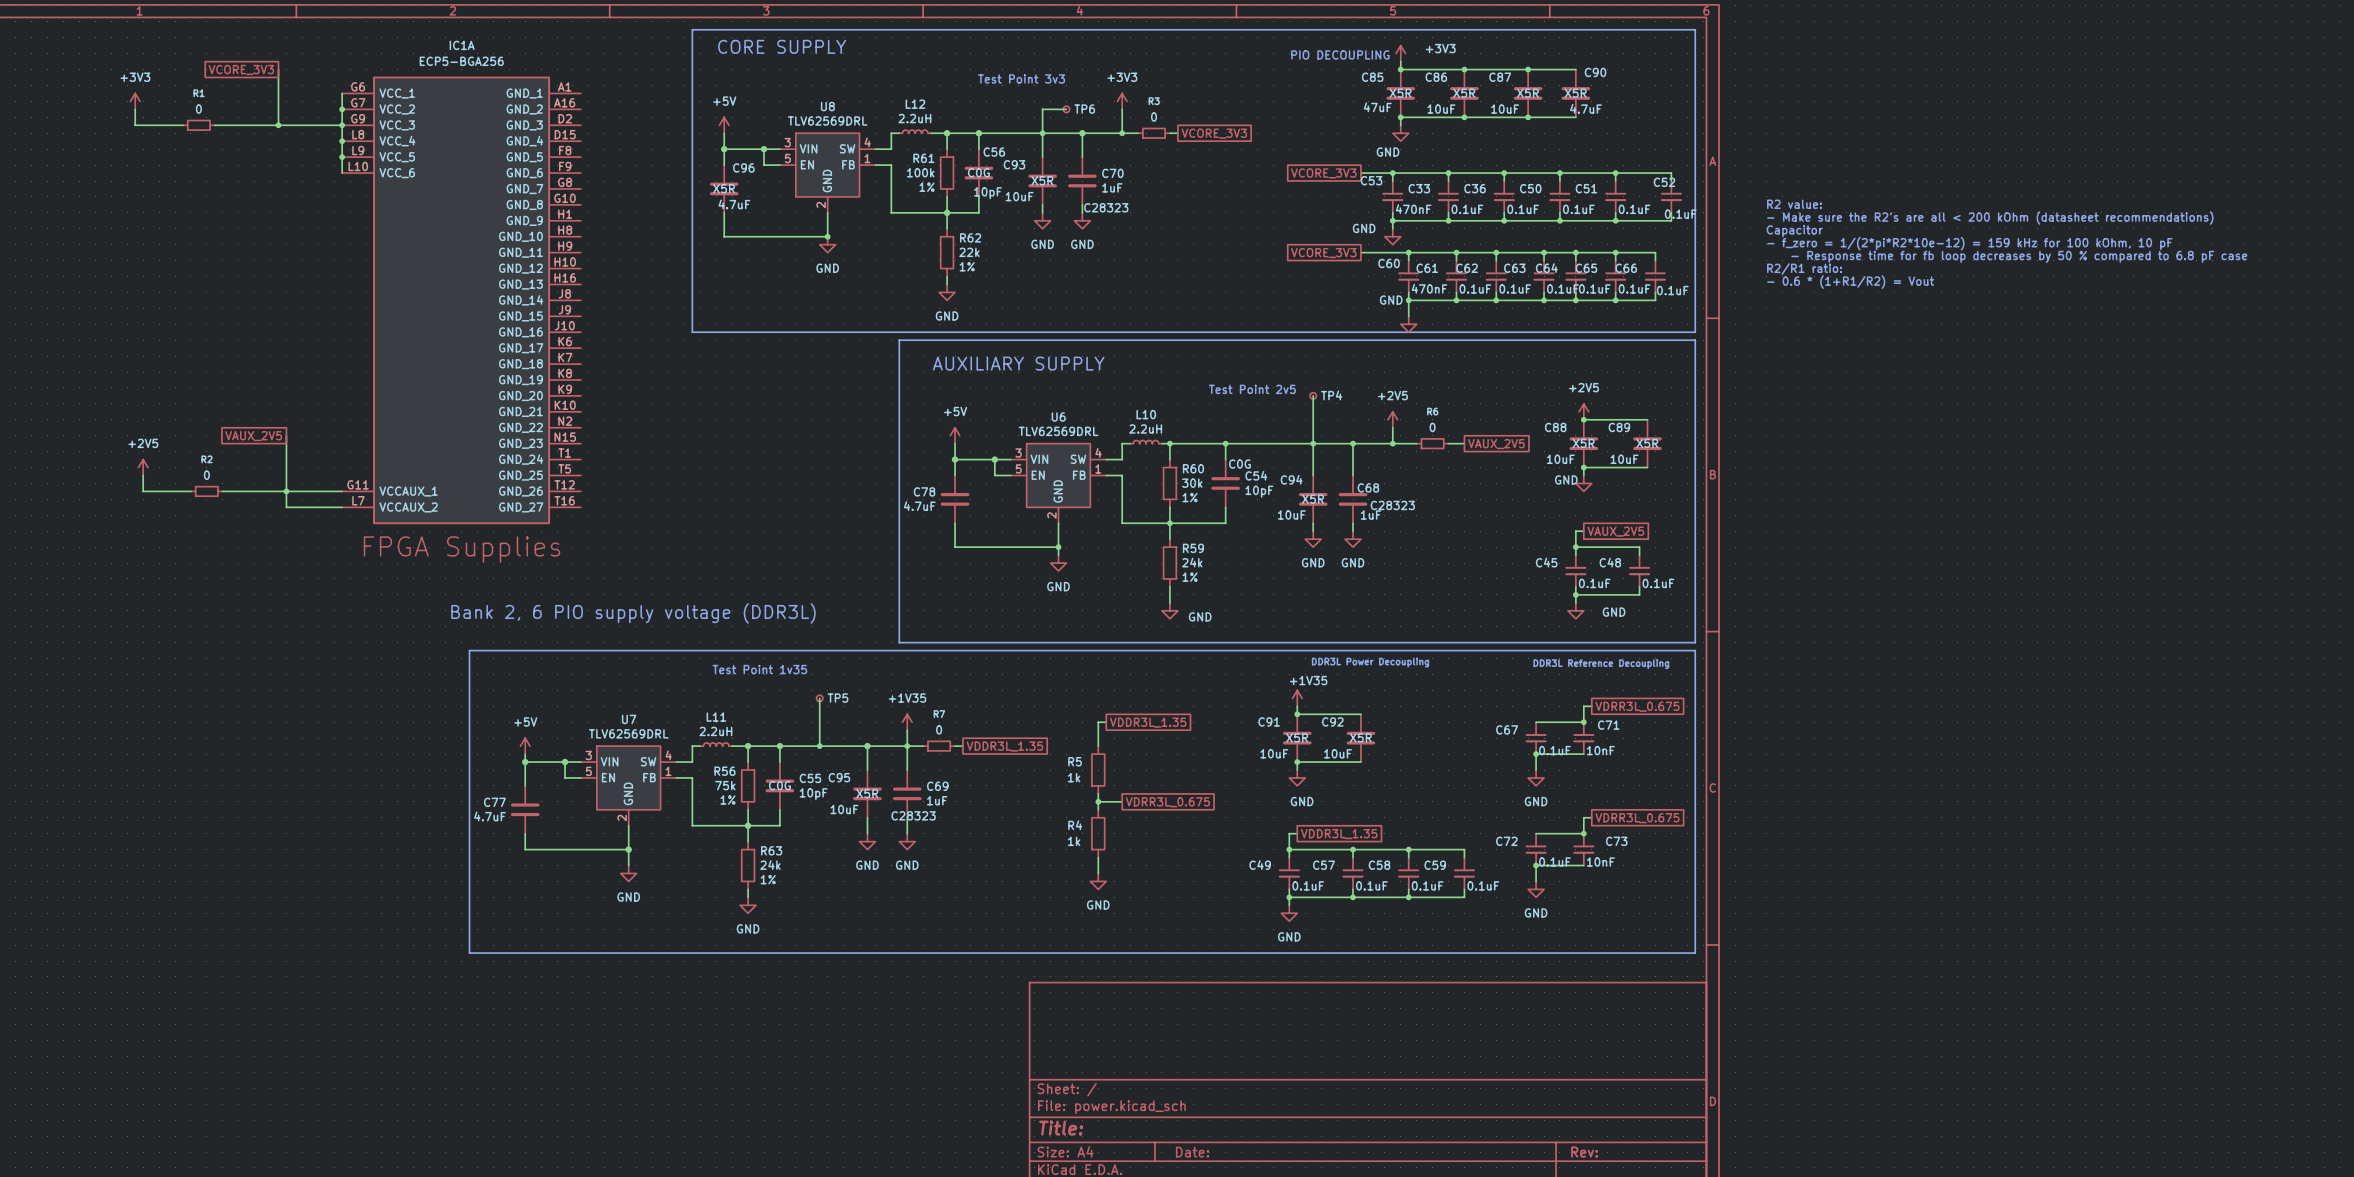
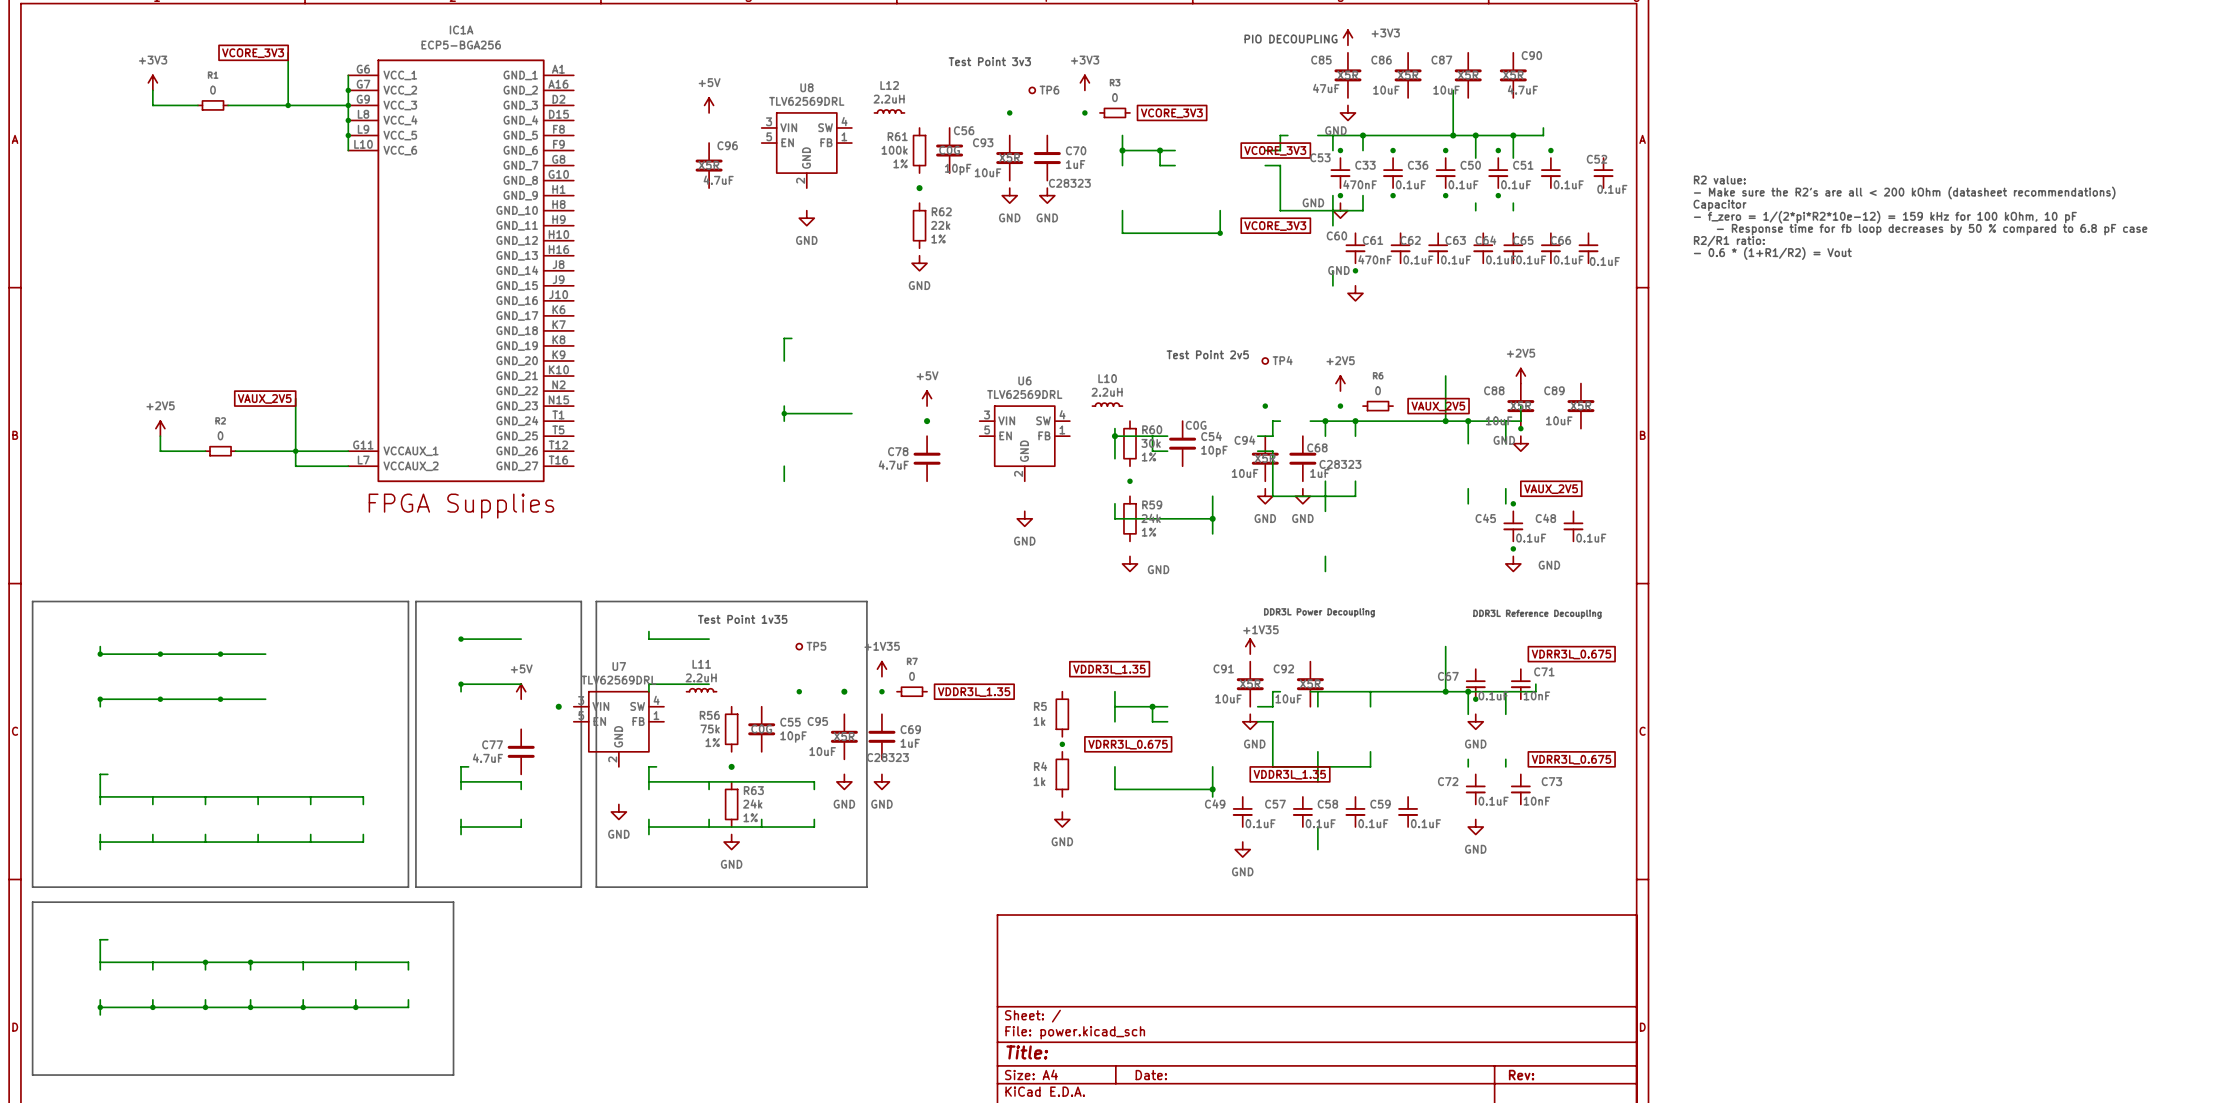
line: (692, 29) (1695, 29) (1695, 332) (692, 332) (692, 29) -> none
text: CORE SUPPLY (782, 46) -> none
wire: (1400, 61) (1400, 69) (1575, 69) -> none
junction: (1400, 69) -> none
junction: (1464, 69) -> none
junction: (1528, 69) -> none
wire: (1066, 109) (1042, 109) (1042, 157) -> none
wire: (1122, 109) (1122, 133) -> none
wire: none -> (1453, 90) (1453, 135)
junction: (1400, 117) -> none
junction: (1464, 117) -> none
junction: (1528, 117) -> none
wire: (1575, 117) (1400, 117) (1400, 125) -> none
wire: (724, 133) (724, 165) -> none
wire: (899, 133) (891, 133) (891, 149) (875, 149) -> none
wire: (931, 133) (1138, 133) -> none
wire: (947, 133) (947, 149) -> none
junction: (947, 133) -> none
wire: (978, 133) (978, 149) -> none
junction: (978, 133) -> none
wire: (1082, 133) (1082, 157) -> none
junction: (1082, 133) -> none
wire: (1169, 133) (1177, 133) -> none
wire: (724, 149) (779, 149) -> none
junction: (724, 149) -> none
wire: (764, 149) (764, 165) (779, 165) -> none
junction: (764, 149) -> none
wire: none -> (1543, 127) (1543, 135) (1317, 135)
wire: none -> (1122, 135) (1122, 165)
wire: none -> (1287, 135) (1280, 135) (1280, 150) (1265, 150)
wire: none -> (1363, 135) (1363, 150)
junction: none -> (1363, 135)
junction: none -> (1453, 135)
wire: none -> (1475, 135) (1475, 158)
junction: none -> (1475, 135)
wire: none -> (1513, 135) (1513, 158)
junction: none -> (1513, 135)
wire: (875, 165) (891, 165) (891, 212) (978, 212) (978, 196) -> none
wire: none -> (1122, 150) (1175, 150)
junction: none -> (1122, 150)
wire: none -> (1160, 150) (1160, 165) (1175, 165)
junction: none -> (1160, 150)
wire: (1360, 173) (1671, 173) (1671, 181) -> none
wire: (1392, 173) (1392, 181) -> none
wire: (1448, 173) (1448, 181) -> none
wire: (1504, 173) (1504, 181) -> none
wire: (1559, 173) (1559, 181) -> none
wire: (1615, 173) (1615, 181) -> none
wire: none -> (1265, 165) (1280, 165) (1280, 210) (1363, 210) (1363, 195)
wire: (947, 196) (947, 228) -> none
wire: (1042, 204) (1042, 212) -> none
wire: (1082, 204) (1082, 212) -> none
wire: (724, 212) (724, 236) (827, 236) (827, 212) -> none
wire: (1392, 212) (1392, 228) -> (1332, 135) (1332, 150)
wire: (1448, 212) (1448, 220) -> none
wire: (1504, 212) (1504, 220) -> none
wire: (1559, 212) (1559, 220) -> none
wire: (1615, 212) (1615, 220) -> none
wire: (1671, 212) (1671, 220) (1392, 220) -> none
wire: none -> (1332, 195) (1332, 225)
junction: (1615, 220) -> none
junction: (827, 236) -> none
wire: none -> (1122, 210) (1122, 233) (1220, 233) (1220, 210)
wire: (1360, 252) (1655, 252) (1655, 260) -> none
wire: (1408, 252) (1408, 260) -> none
junction: (1408, 252) -> none
wire: (1456, 252) (1456, 260) -> none
junction: (1456, 252) -> none
wire: (1496, 252) (1496, 260) -> none
junction: (1496, 252) -> none
wire: (1544, 252) (1544, 260) -> none
junction: (1544, 252) -> none
wire: (1575, 252) (1575, 260) -> (1475, 203) (1475, 210)
junction: (1575, 252) -> none
wire: (1615, 252) (1615, 260) -> (1513, 203) (1513, 210)
junction: (1615, 252) -> none
junction: none -> (1220, 233)
wire: (947, 276) (947, 284) -> none
wire: (1408, 292) (1408, 316) -> none
wire: (1456, 292) (1456, 300) -> none
wire: (1496, 292) (1496, 300) -> none
wire: (1544, 292) (1544, 300) -> none
wire: (1575, 292) (1575, 300) -> none
wire: (1615, 292) (1615, 300) -> none
wire: (1655, 292) (1655, 300) (1408, 300) -> none
wire: none -> (1332, 270) (1332, 285)
junction: (1456, 300) -> none
junction: (1496, 300) -> none
junction: (1544, 300) -> none
junction: (1575, 300) -> none
junction: (1615, 300) -> none
line: (899, 340) (1695, 340) (1695, 642) (899, 642) (899, 340) -> none
text: AUXILIARY SUPPLY (1018, 363) -> none
wire: none -> (791, 338) (784, 338) (784, 360)
wire: (1313, 395) (1313, 475) -> none
wire: none -> (1445, 376) (1445, 421)
wire: (1583, 419) (1647, 419) -> none
junction: (1583, 419) -> none
wire: (1392, 427) (1392, 443) -> (1325, 421) (1325, 436)
wire: none -> (784, 406) (784, 421)
wire: (955, 443) (955, 475) -> none
wire: (1130, 443) (1122, 443) (1122, 459) (1106, 459) -> none
wire: (1161, 443) (1416, 443) -> none
wire: (1169, 443) (1169, 459) -> none
junction: (1169, 443) -> none
wire: (1225, 443) (1225, 459) -> none
junction: (1225, 443) -> none
wire: (1353, 443) (1353, 475) -> (1325, 481) (1325, 511)
junction: (1353, 443) -> none
wire: (1448, 443) (1464, 443) -> none
wire: none -> (1520, 406) (1520, 421) (1310, 421)
wire: none -> (784, 413) (851, 413)
junction: none -> (784, 413)
wire: (955, 459) (1010, 459) -> none
wire: (994, 459) (994, 475) (1010, 475) -> none
junction: (994, 459) -> none
wire: none -> (1280, 421) (1272, 421) (1272, 436) (1257, 436)
junction: none -> (1325, 421)
wire: none -> (1355, 421) (1355, 436)
junction: none -> (1355, 421)
junction: none -> (1445, 421)
wire: none -> (1468, 421) (1468, 443)
junction: none -> (1468, 421)
wire: none -> (1505, 421) (1505, 443)
wire: (1647, 467) (1583, 467) (1583, 475) -> none
wire: (1106, 475) (1122, 475) (1122, 523) (1225, 523) (1225, 507) -> none
wire: none -> (1114, 436) (1167, 436)
junction: none -> (1114, 436)
wire: none -> (1152, 436) (1152, 451) (1167, 451)
wire: none -> (1257, 451) (1272, 451) (1272, 496) (1355, 496) (1355, 481)
wire: none -> (784, 466) (784, 481)
wire: (1169, 507) (1169, 539) -> (1114, 428) (1114, 458)
wire: (955, 523) (955, 547) (1058, 547) -> none
wire: (1058, 523) (1058, 555) -> none
wire: (1313, 523) (1313, 531) -> none
wire: (1353, 523) (1353, 531) -> none
wire: none -> (1468, 488) (1468, 503)
wire: (1583, 531) (1575, 531) (1575, 555) -> none
wire: none -> (1212, 496) (1212, 533)
junction: (1058, 547) -> none
wire: none -> (1114, 503) (1114, 518) (1212, 518)
wire: (1575, 547) (1639, 547) (1639, 555) -> none
junction: none -> (1212, 518)
wire: (1169, 586) (1169, 602) -> none
wire: (1575, 586) (1575, 602) -> (1505, 488) (1505, 503)
wire: (1639, 586) (1639, 594) (1575, 594) -> none
wire: none -> (1325, 556) (1325, 571)
text: Bank 2, 6 PIO supply voltage (DDR3L) (633, 613) -> none
line: none -> (32, 601) (408, 601) (408, 887) (32, 887) (32, 601)
line: (469, 650) (469, 953) -> (468, 601) (415, 601) (415, 887) (468, 887)
line: (588, 650) (604, 650) -> (581, 601) (581, 887)
line: (891, 650) (1695, 650) (1695, 953) (891, 953) -> (866, 601) (866, 887)
wire: none -> (648, 631) (648, 639) (709, 639)
wire: none -> (461, 639) (521, 639)
junction: none -> (461, 639)
wire: none -> (100, 646) (100, 654) (265, 654)
wire: (819, 698) (819, 746) -> none
wire: none -> (1445, 646) (1445, 691)
junction: none -> (100, 654)
junction: none -> (160, 654)
junction: none -> (220, 654)
wire: (1297, 706) (1297, 714) (1360, 714) -> none
wire: (1591, 706) (1583, 706) (1583, 722) (1536, 722) -> none
junction: (1297, 714) -> none
wire: (1106, 722) (1098, 722) (1098, 746) -> none
junction: (1583, 722) -> none
wire: (907, 730) (907, 770) -> none
junction: none -> (461, 684)
wire: none -> (521, 684) (461, 684) (461, 691)
wire: none -> (709, 684) (648, 684) (648, 691)
wire: none -> (1535, 684) (1535, 691) (1310, 691)
wire: (700, 746) (692, 746) (692, 762) (676, 762) -> none
wire: (732, 746) (923, 746) -> none
wire: (748, 746) (748, 762) -> none
junction: (748, 746) -> none
wire: (779, 746) (779, 762) -> none
junction: (779, 746) -> none
wire: (867, 746) (867, 770) -> none
wire: (955, 746) (962, 746) -> none
wire: none -> (1114, 691) (1114, 721)
wire: none -> (1317, 691) (1317, 706)
wire: none -> (1370, 691) (1370, 706)
junction: none -> (1445, 691)
wire: none -> (1468, 691) (1468, 714)
junction: none -> (1468, 691)
wire: none -> (1505, 691) (1505, 714)
junction: none -> (100, 699)
junction: none -> (160, 699)
junction: none -> (220, 699)
wire: none -> (265, 699) (100, 699) (100, 706)
wire: (525, 754) (525, 785) -> none
wire: (1583, 754) (1536, 754) (1536, 770) -> none
wire: (525, 762) (580, 762) -> none
junction: (525, 762) -> none
wire: (565, 762) (565, 777) (580, 777) -> none
wire: none -> (1114, 706) (1167, 706)
wire: none -> (1152, 706) (1152, 721) (1167, 721)
junction: none -> (1152, 706)
junction: (1297, 762) -> none
wire: (1305, 762) (1297, 762) (1297, 770) -> none
wire: (1321, 762) (1360, 762) -> (1272, 706) (1272, 691) (1280, 691)
wire: (676, 777) (692, 777) (692, 825) (779, 825) (779, 809) -> none
wire: none -> (1257, 721) (1272, 721) (1272, 766) (1370, 766) (1370, 751)
wire: (1098, 793) (1098, 809) -> none
wire: (1098, 801) (1122, 801) -> none
wire: (748, 809) (748, 841) -> none
wire: none -> (1317, 751) (1317, 781)
wire: (867, 817) (867, 833) -> none
wire: (907, 817) (907, 833) -> none
wire: none -> (1505, 759) (1505, 766)
wire: (1591, 817) (1583, 817) (1583, 833) (1536, 833) -> none
wire: none -> (468, 766) (461, 766) (461, 789)
wire: (628, 825) (628, 865) -> none
wire: none -> (656, 766) (648, 766) (648, 789)
wire: none -> (1114, 766) (1114, 789) (1212, 789)
wire: none -> (1212, 766) (1212, 796)
wire: none -> (107, 774) (100, 774) (100, 804)
wire: (525, 833) (525, 841) -> (461, 781) (521, 781)
wire: (1297, 833) (1289, 833) (1289, 857) -> none
junction: (1583, 833) -> none
wire: none -> (648, 781) (814, 781) (814, 789)
wire: none -> (709, 781) (709, 789)
wire: (525, 849) (628, 849) -> none
junction: (628, 849) -> none
junction: none -> (1212, 789)
wire: (1289, 849) (1464, 849) (1464, 857) -> none
junction: (1289, 849) -> none
wire: (1353, 849) (1353, 857) -> none
junction: (1353, 849) -> none
wire: (1408, 849) (1408, 857) -> (1468, 759) (1468, 766)
junction: (1408, 849) -> none
wire: none -> (100, 796) (363, 796) (363, 804)
wire: none -> (152, 796) (152, 804)
wire: none -> (205, 796) (205, 804)
wire: none -> (258, 796) (258, 804)
wire: none -> (310, 796) (310, 804)
wire: (1098, 857) (1098, 873) -> none
junction: (1536, 865) -> none
wire: (1583, 865) (1536, 865) (1536, 881) -> none
wire: none -> (461, 819) (461, 834)
wire: none -> (521, 819) (521, 827) (461, 827)
wire: none -> (648, 819) (648, 834)
wire: none -> (761, 819) (761, 827)
wire: none -> (814, 819) (814, 827) (648, 827)
wire: (748, 889) (748, 897) -> (709, 819) (709, 827)
wire: (1289, 889) (1289, 905) -> none
wire: (1353, 889) (1353, 897) -> none
wire: none -> (1317, 827) (1317, 849)
wire: (1408, 889) (1408, 897) -> none
wire: (1464, 889) (1464, 897) (1289, 897) -> none
wire: none -> (100, 834) (100, 849)
wire: none -> (152, 834) (152, 842)
wire: none -> (205, 834) (205, 842)
wire: none -> (258, 834) (258, 842)
wire: none -> (310, 834) (310, 842)
wire: none -> (363, 834) (363, 842) (100, 842)
junction: (1289, 897) -> none
junction: (1353, 897) -> none
junction: (1408, 897) -> none
line: (588, 953) (604, 953) -> (596, 601) (596, 887)
line: none -> (32, 902) (32, 1075) (453, 1075) (453, 902) (32, 902)
wire: none -> (107, 939) (100, 939) (100, 969)
wire: none -> (100, 962) (408, 962) (408, 969)
wire: none -> (152, 962) (152, 969)
wire: none -> (205, 962) (205, 969)
junction: none -> (205, 962)
wire: none -> (250, 962) (250, 969)
junction: none -> (250, 962)
wire: none -> (303, 962) (303, 969)
wire: none -> (355, 962) (355, 969)
wire: none -> (100, 999) (100, 1014)
wire: none -> (152, 999) (152, 1007)
wire: none -> (205, 999) (205, 1007)
wire: none -> (250, 999) (250, 1007)
wire: none -> (303, 999) (303, 1007)
wire: none -> (355, 999) (355, 1007)
wire: none -> (408, 999) (408, 1007) (100, 1007)
junction: none -> (100, 1007)
junction: none -> (152, 1007)
junction: none -> (205, 1007)
junction: none -> (250, 1007)
junction: none -> (303, 1007)
junction: none -> (355, 1007)

